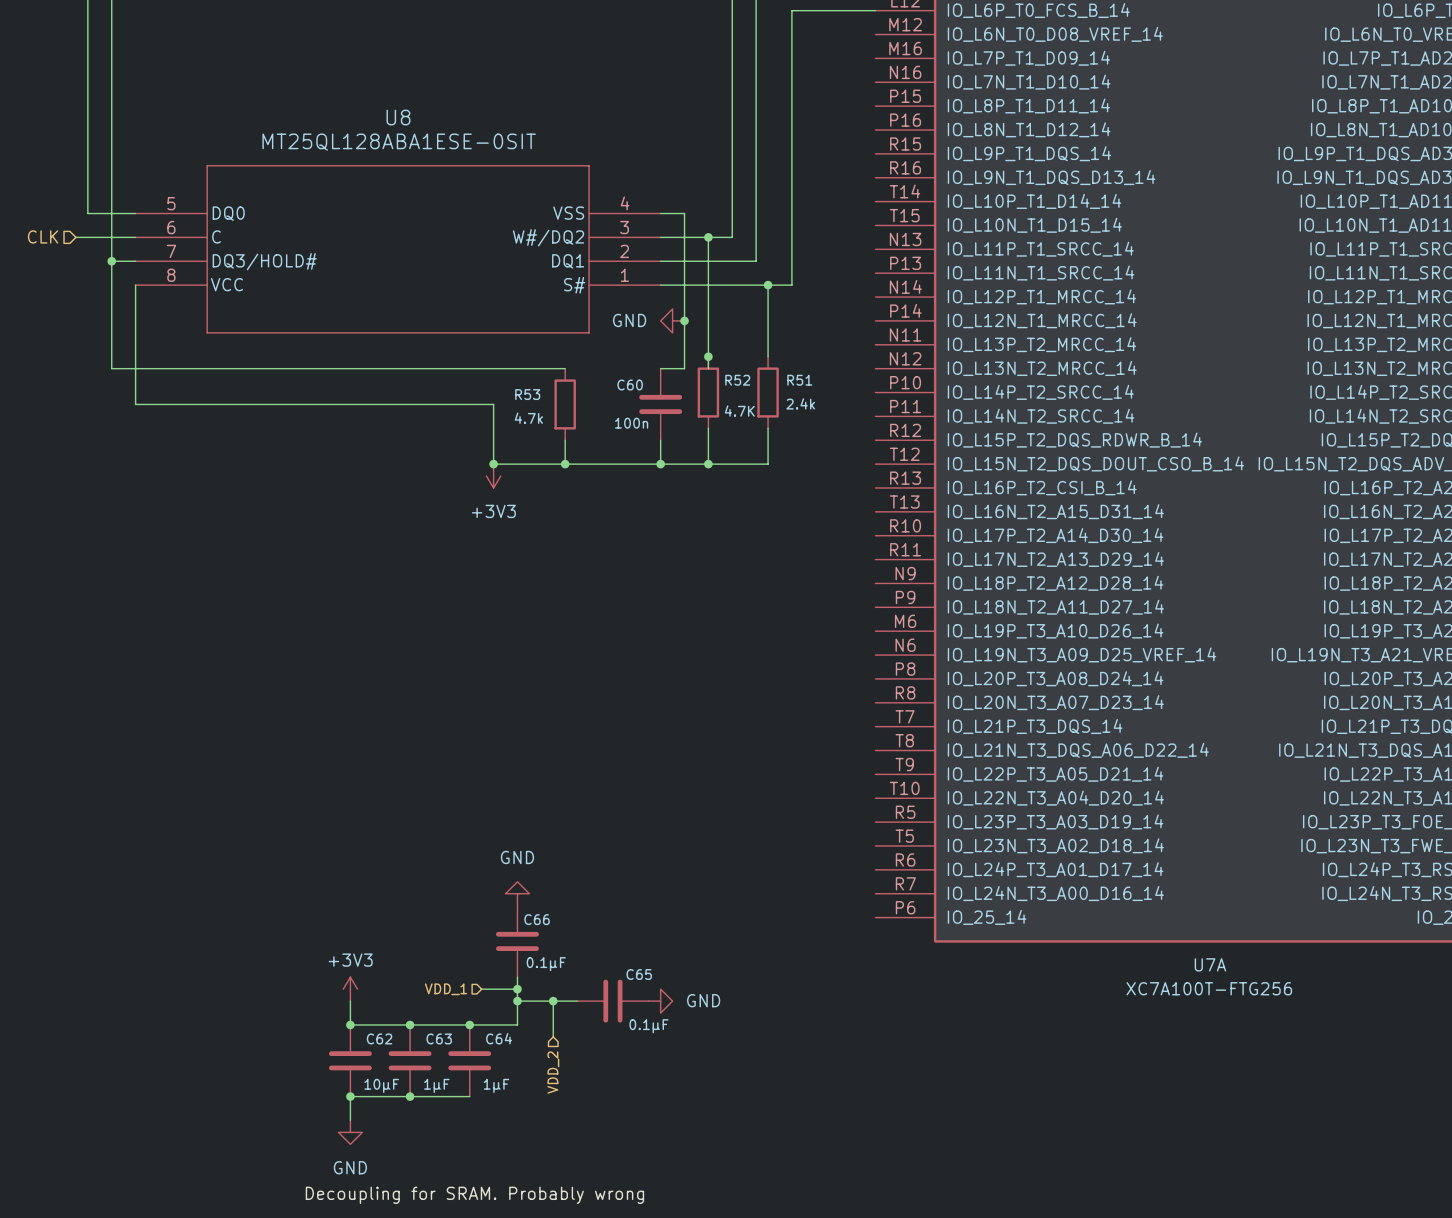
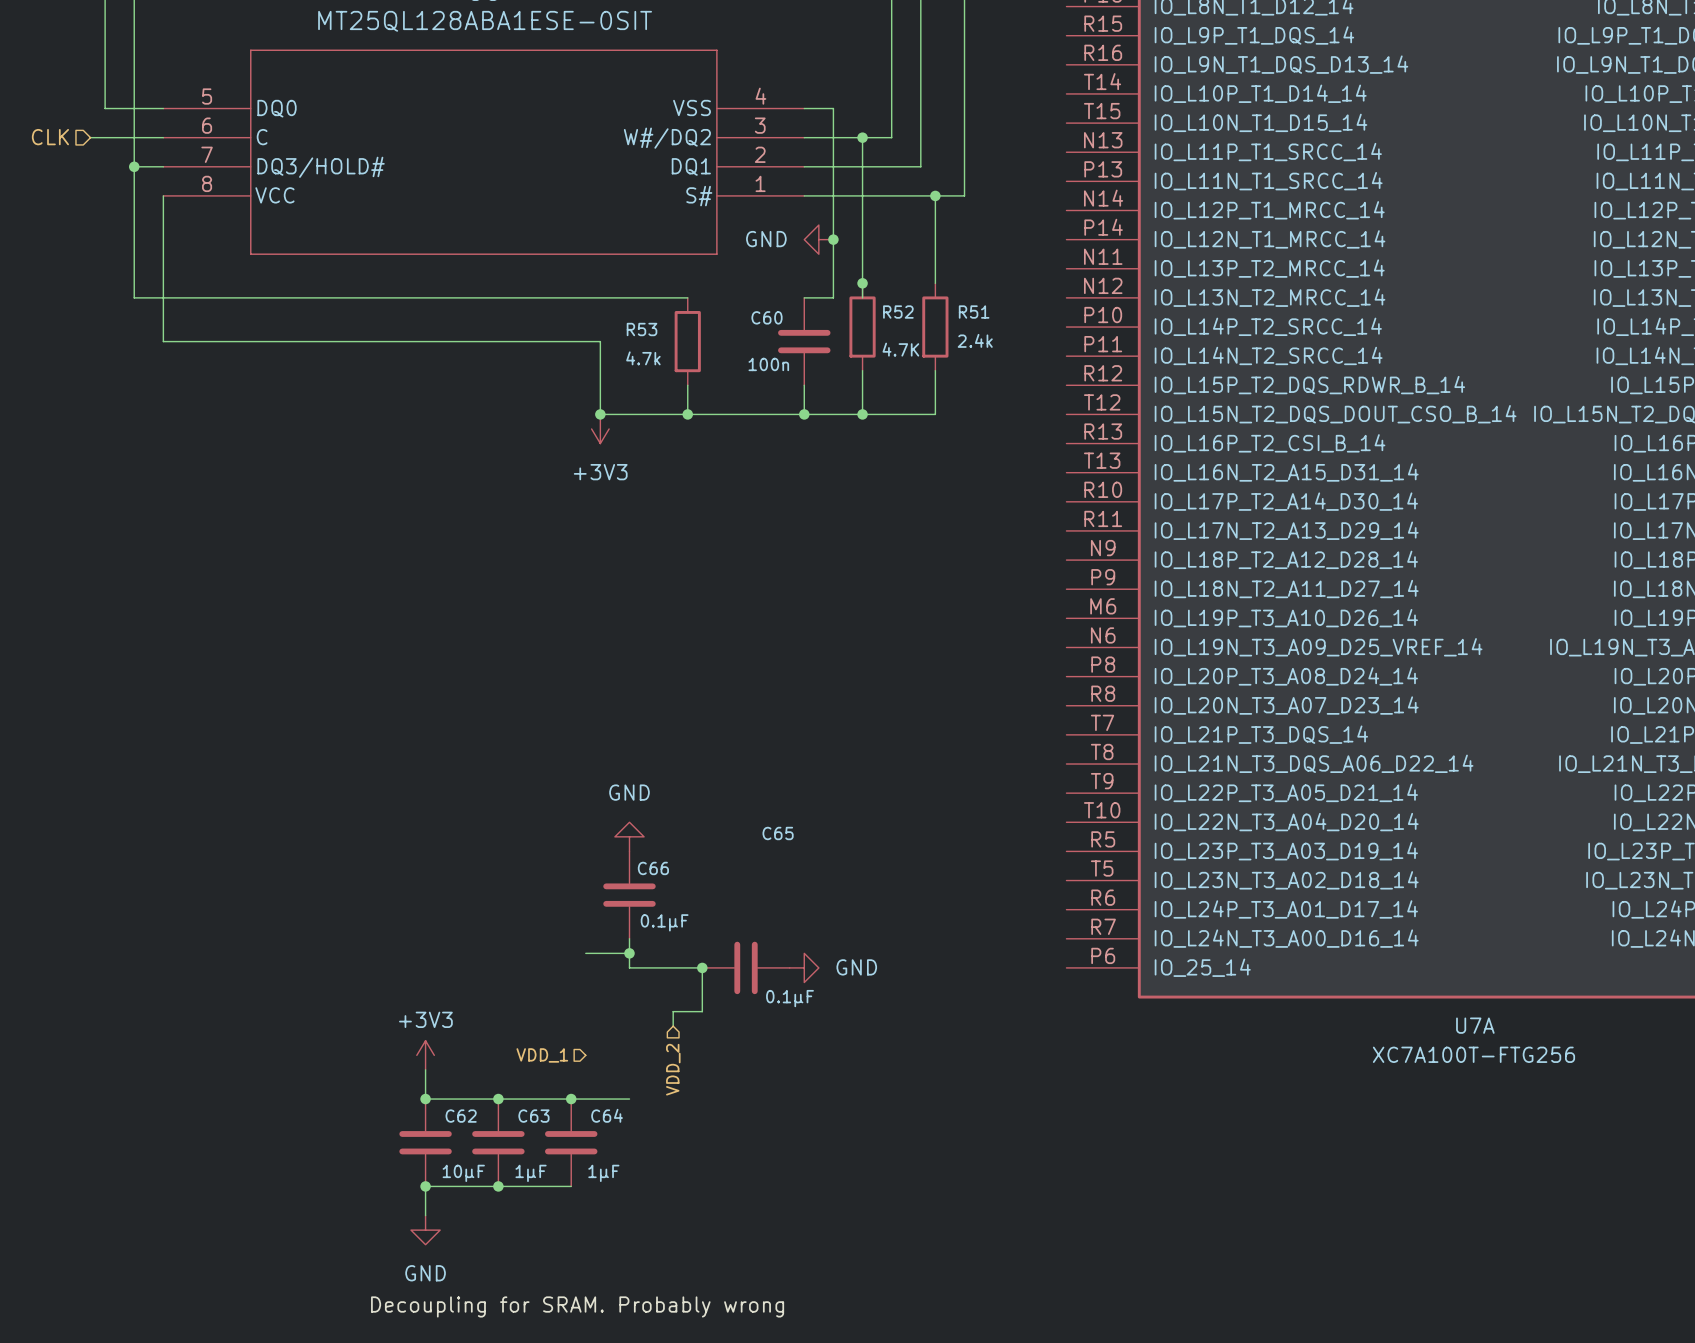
power symbol: none -> GND (629, 836)
wire: none -> (629, 938) (629, 967) (702, 967) (702, 1011) (673, 1011) (673, 1026)
power symbol: GND (517, 893) -> none
junction: none -> (629, 953)
junction: none -> (702, 967)
power symbol: none -> GND (804, 967)
C66 position: (517, 941) -> (629, 895)
C65 name position: C65 (639, 974) -> C65 (778, 833)
wire: (517, 977) (517, 1024) -> none
wire: (481, 989) (517, 989) -> (585, 953) (629, 953)
junction: (517, 989) -> none
wire: (517, 1001) (577, 1001) -> none
junction: (517, 1001) -> none
wire: (553, 1001) (553, 1036) -> none
junction: (553, 1001) -> none
C65 position: (612, 1001) -> (746, 967)
power symbol: GND (660, 1001) -> none
hierarchical label position: VDD_2 (553, 1072) -> VDD_2 (673, 1069)

